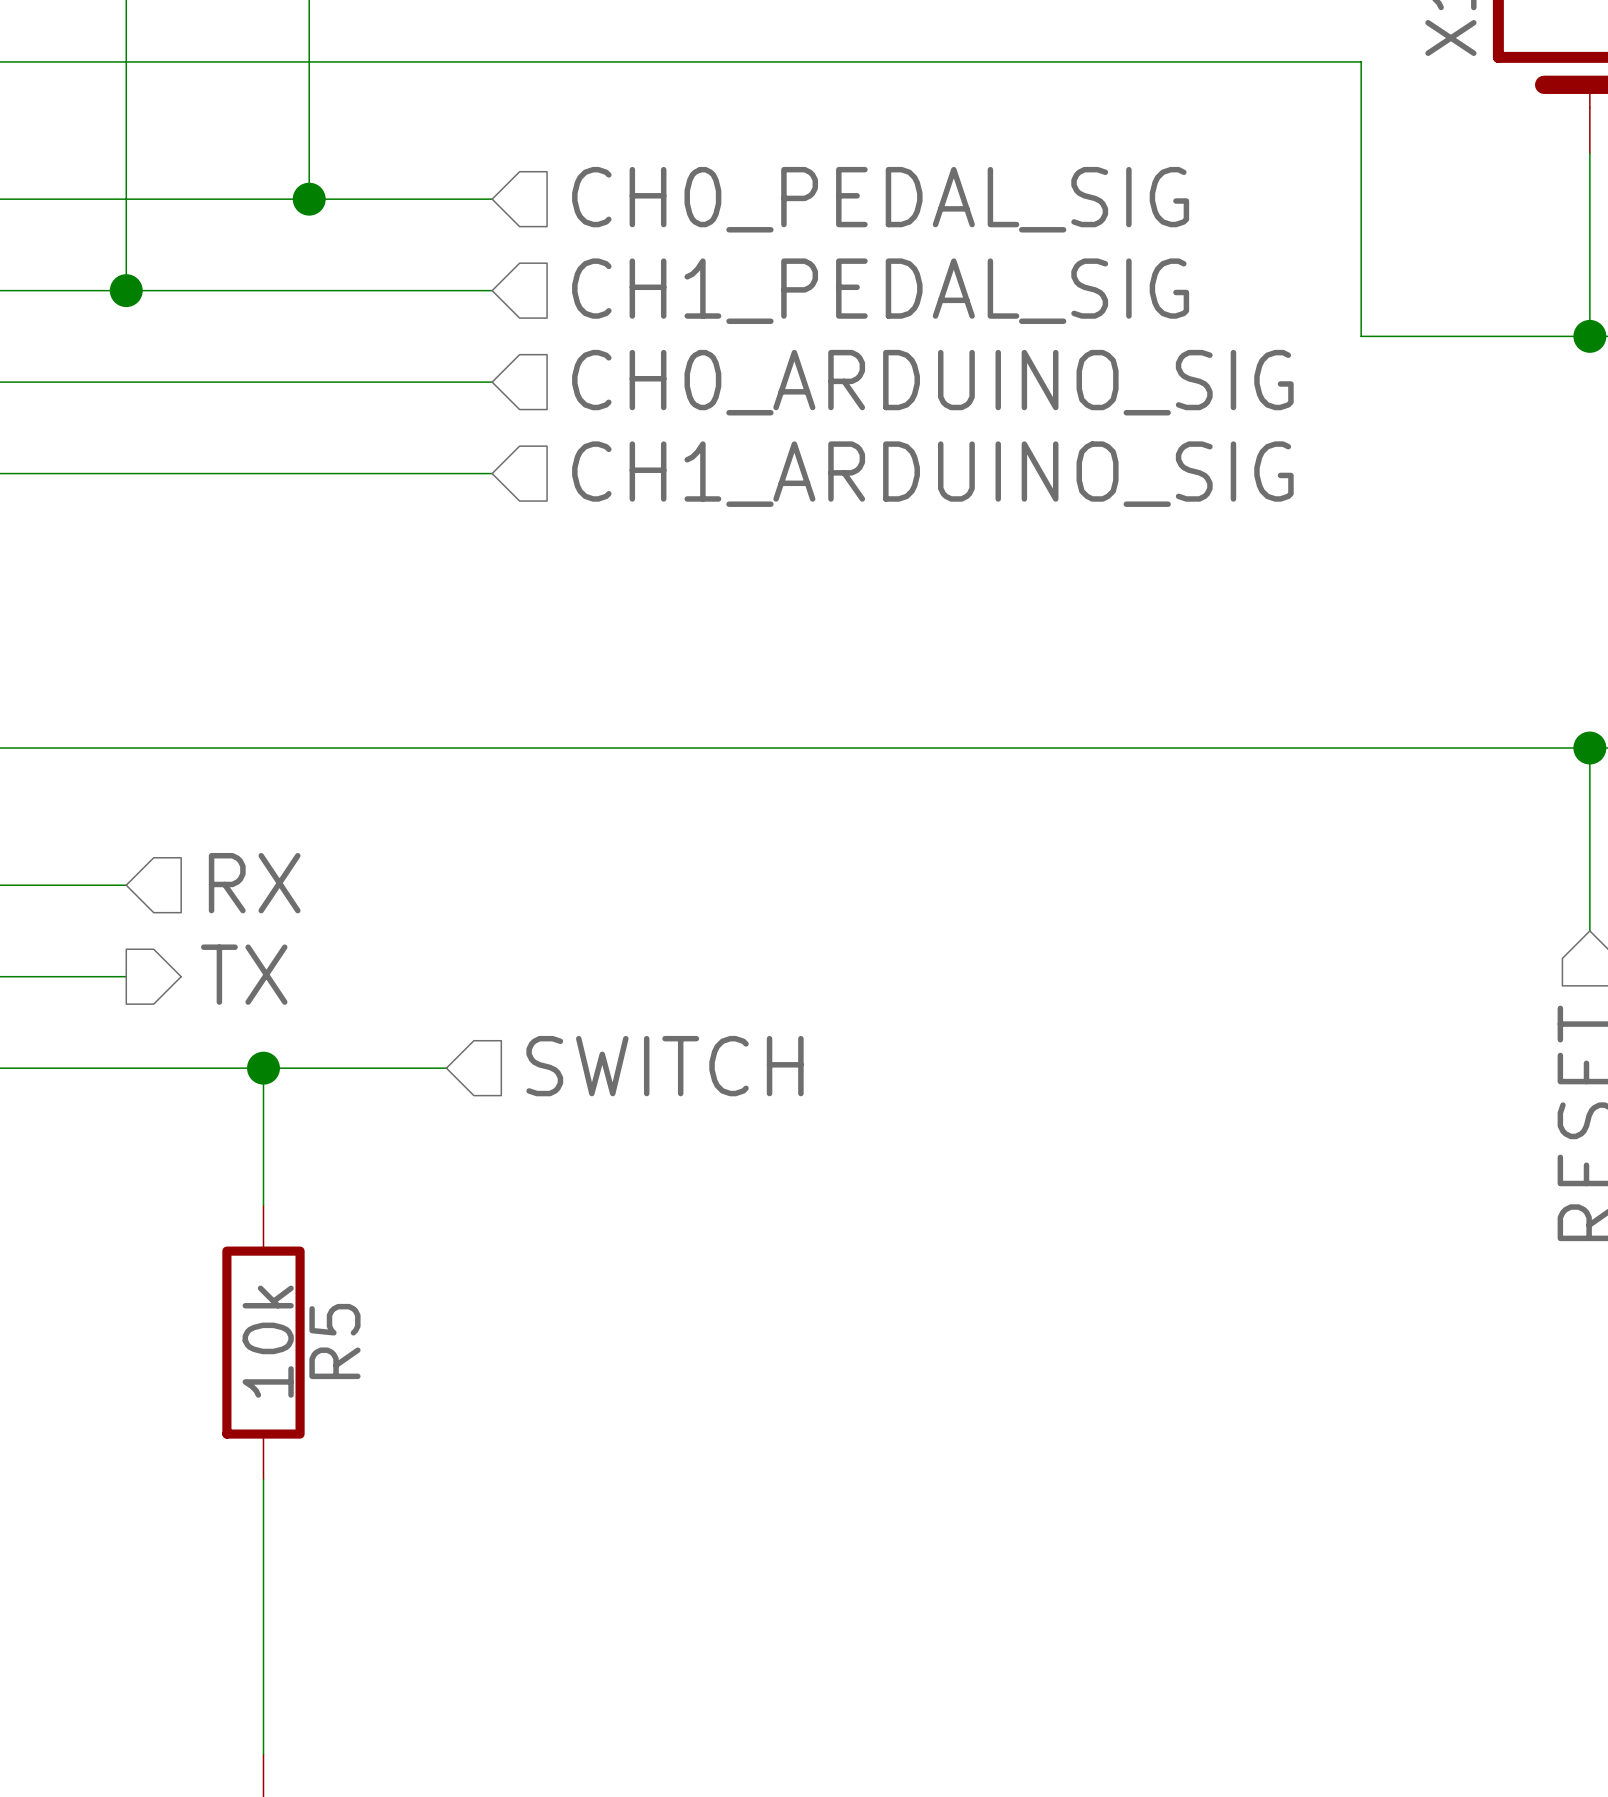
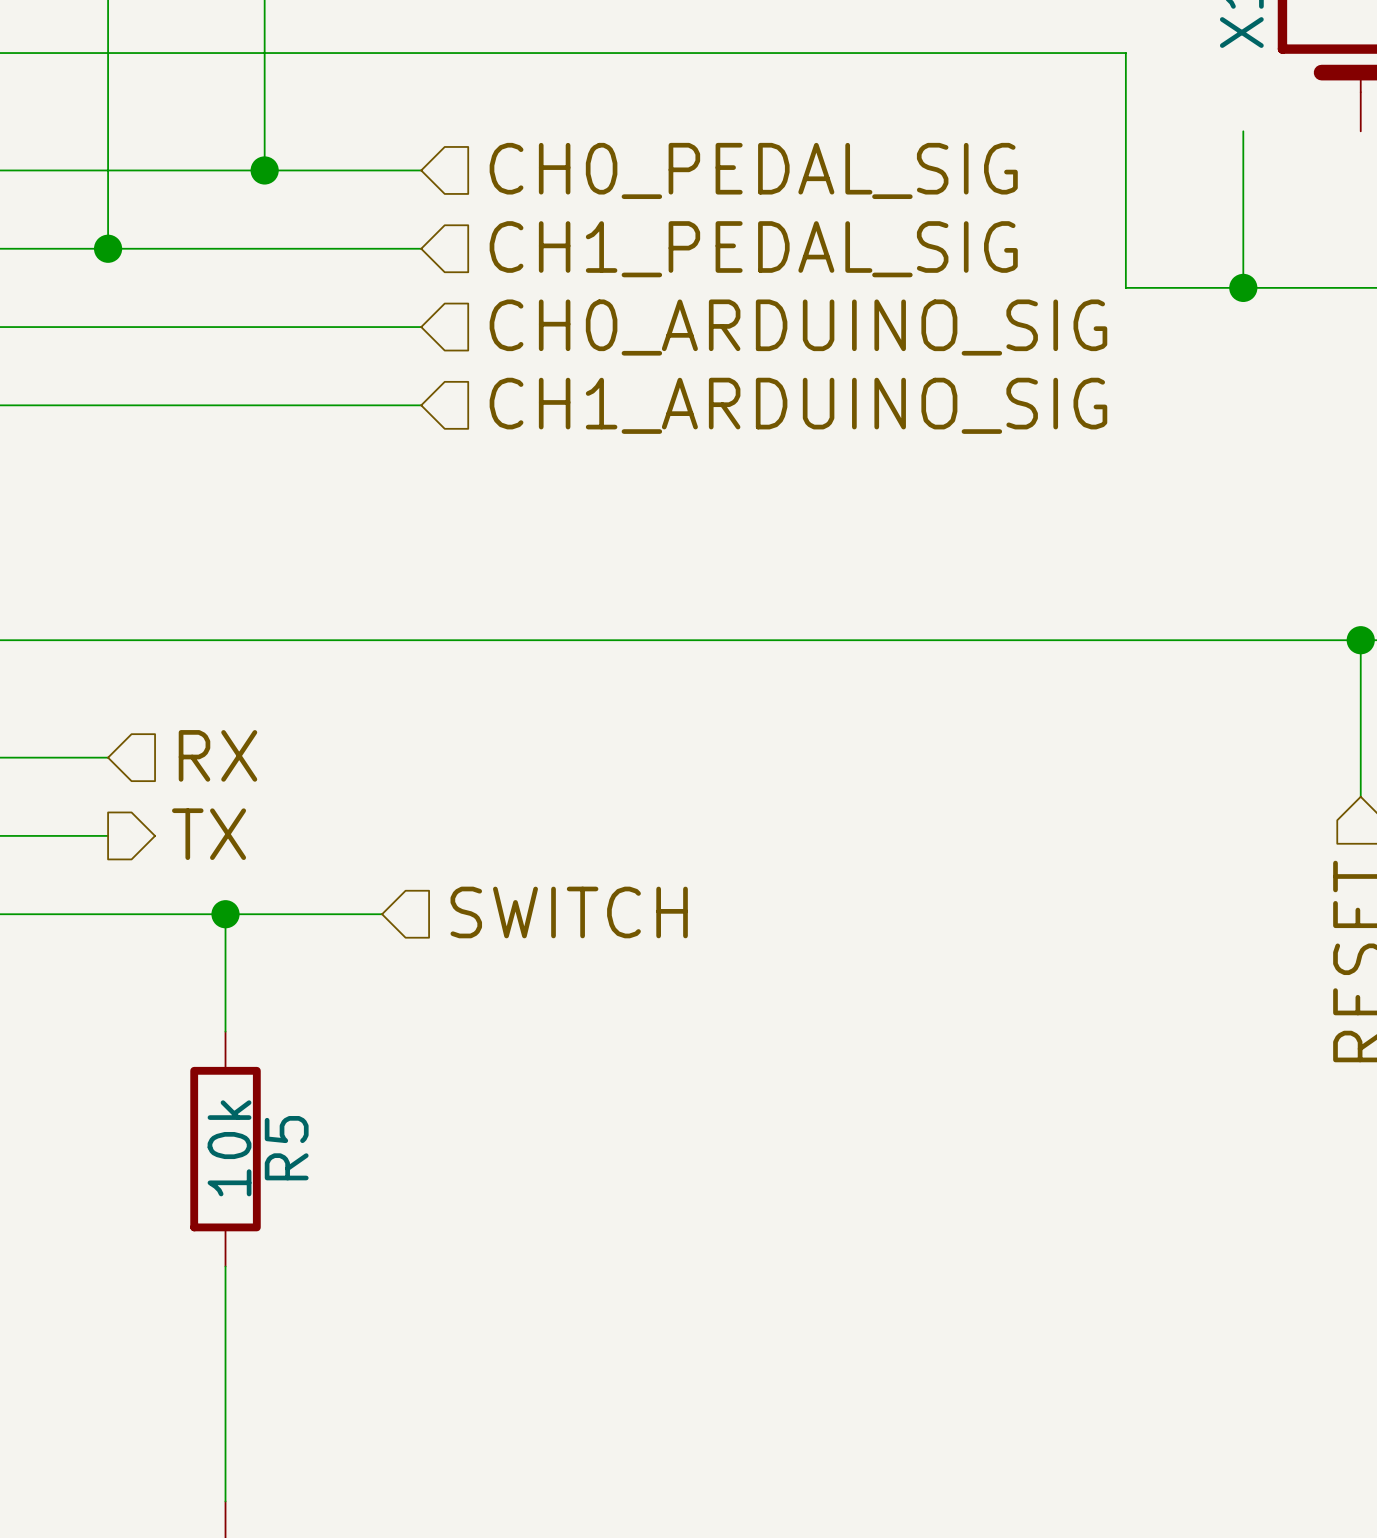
wire: (1315, 61) (1361, 61) (1361, 336) -> (1125, 53) (1125, 287) (1165, 287)
wire: (1589, 153) (1589, 336) -> (1243, 131) (1243, 287)
junction: none -> (1243, 287)
junction: (1589, 336) -> none

